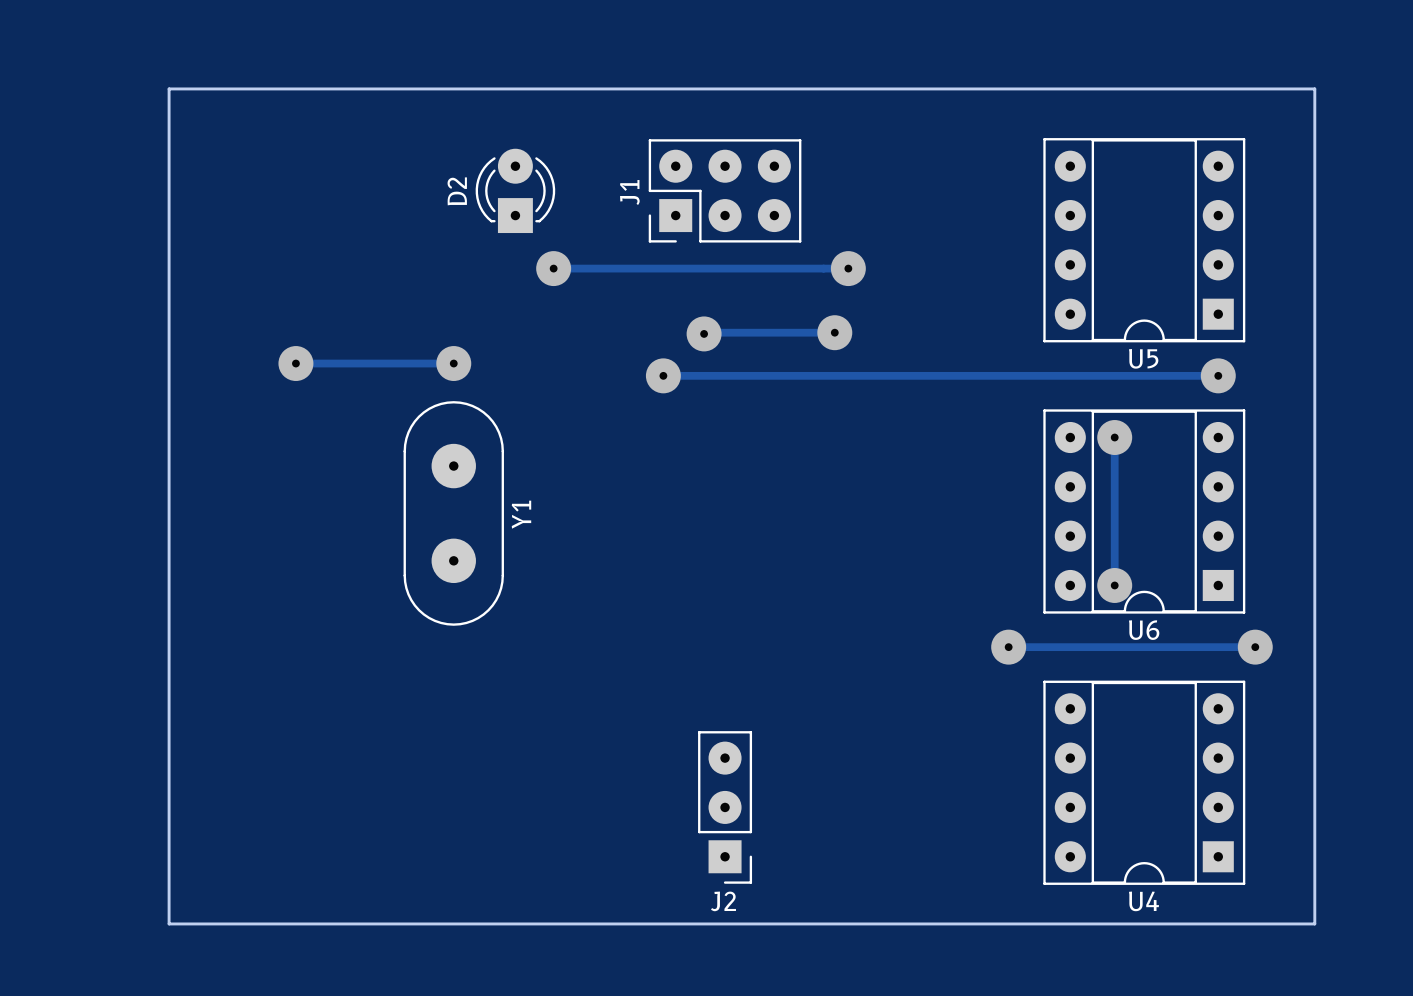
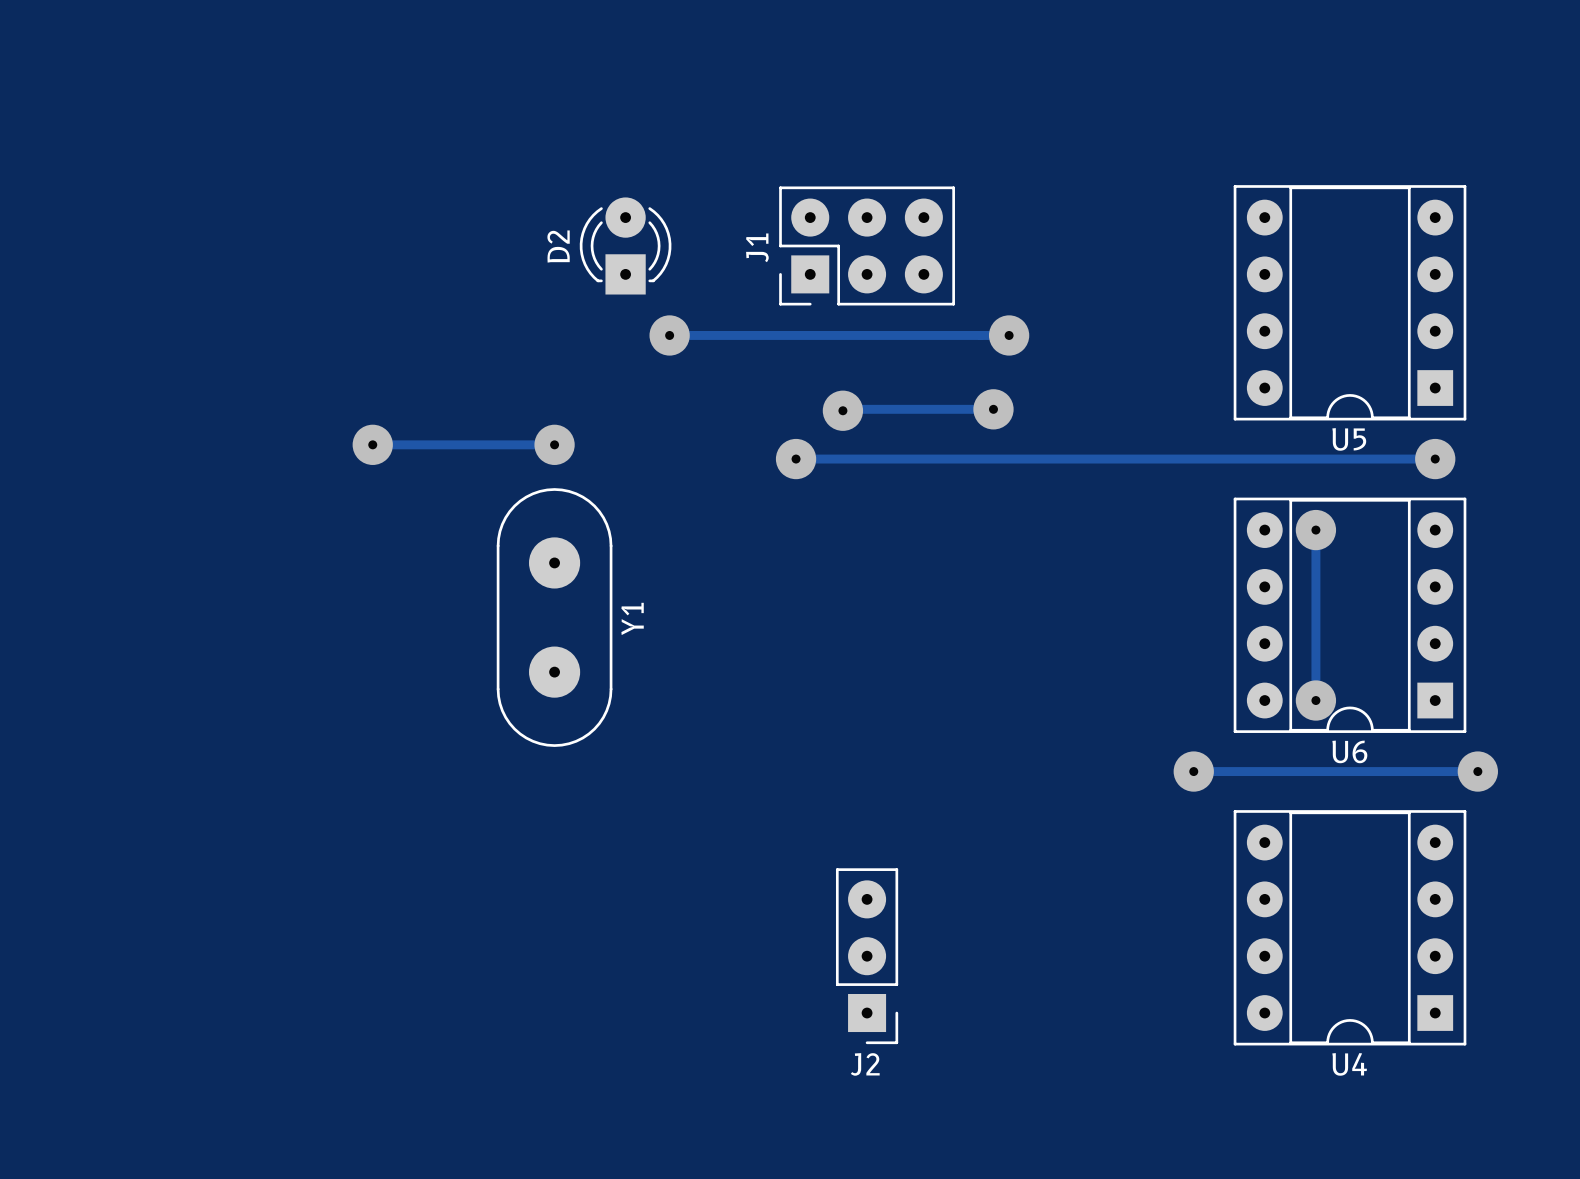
board edge: (169, 88) (1314, 88) (1314, 923) (169, 923) (169, 88) -> none

